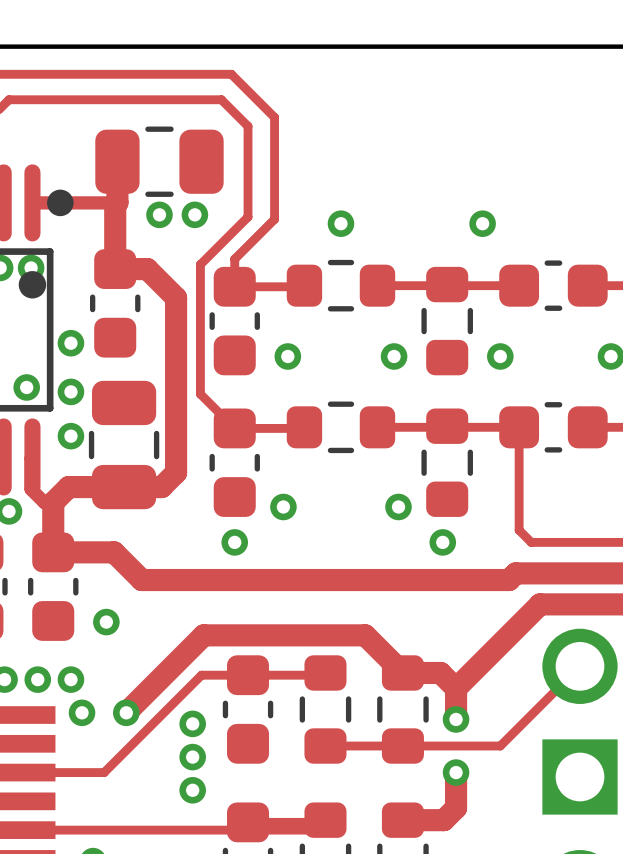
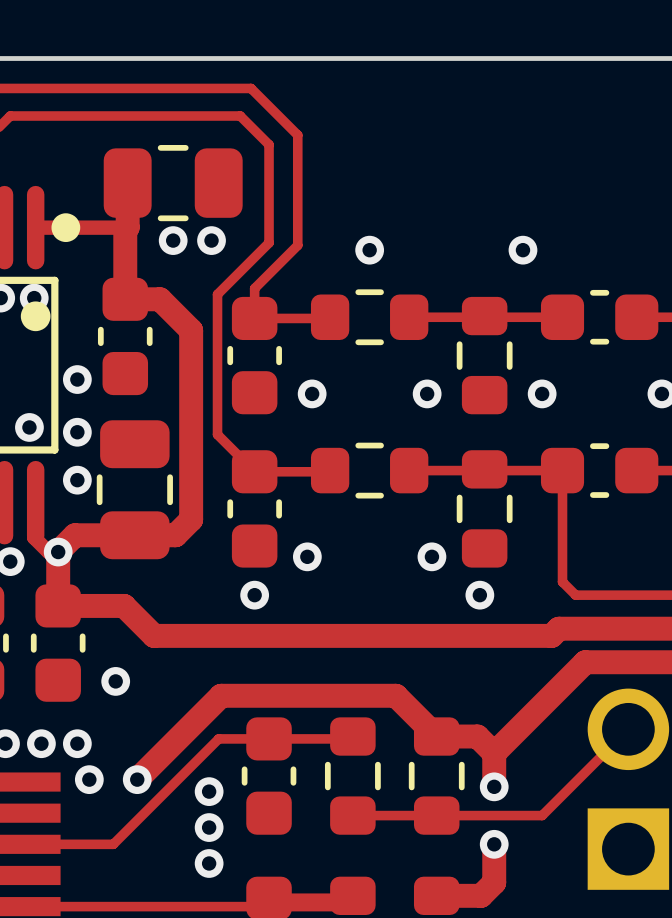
via: none -> (58, 552)

